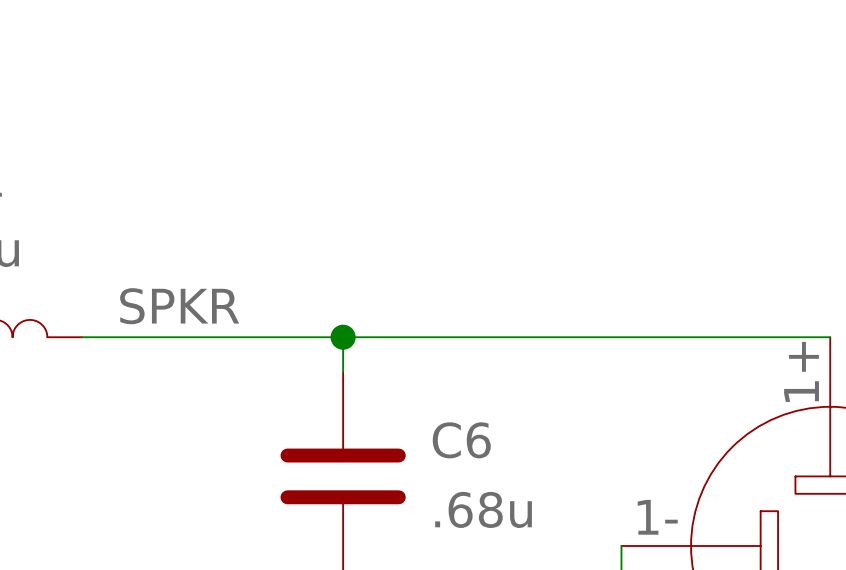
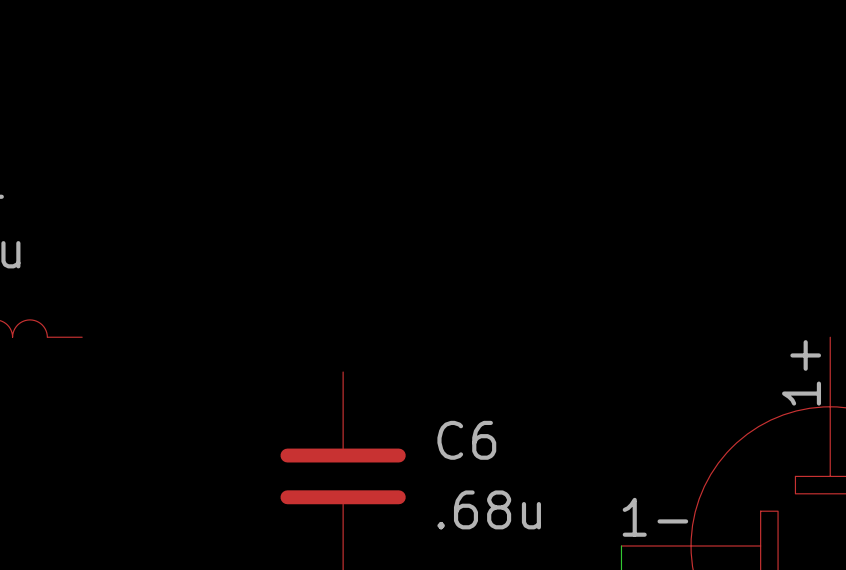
label: SPKR (179, 306) -> none
wire: (82, 337) (830, 337) -> none
wire: (343, 337) (343, 372) -> none
junction: (343, 337) -> none

